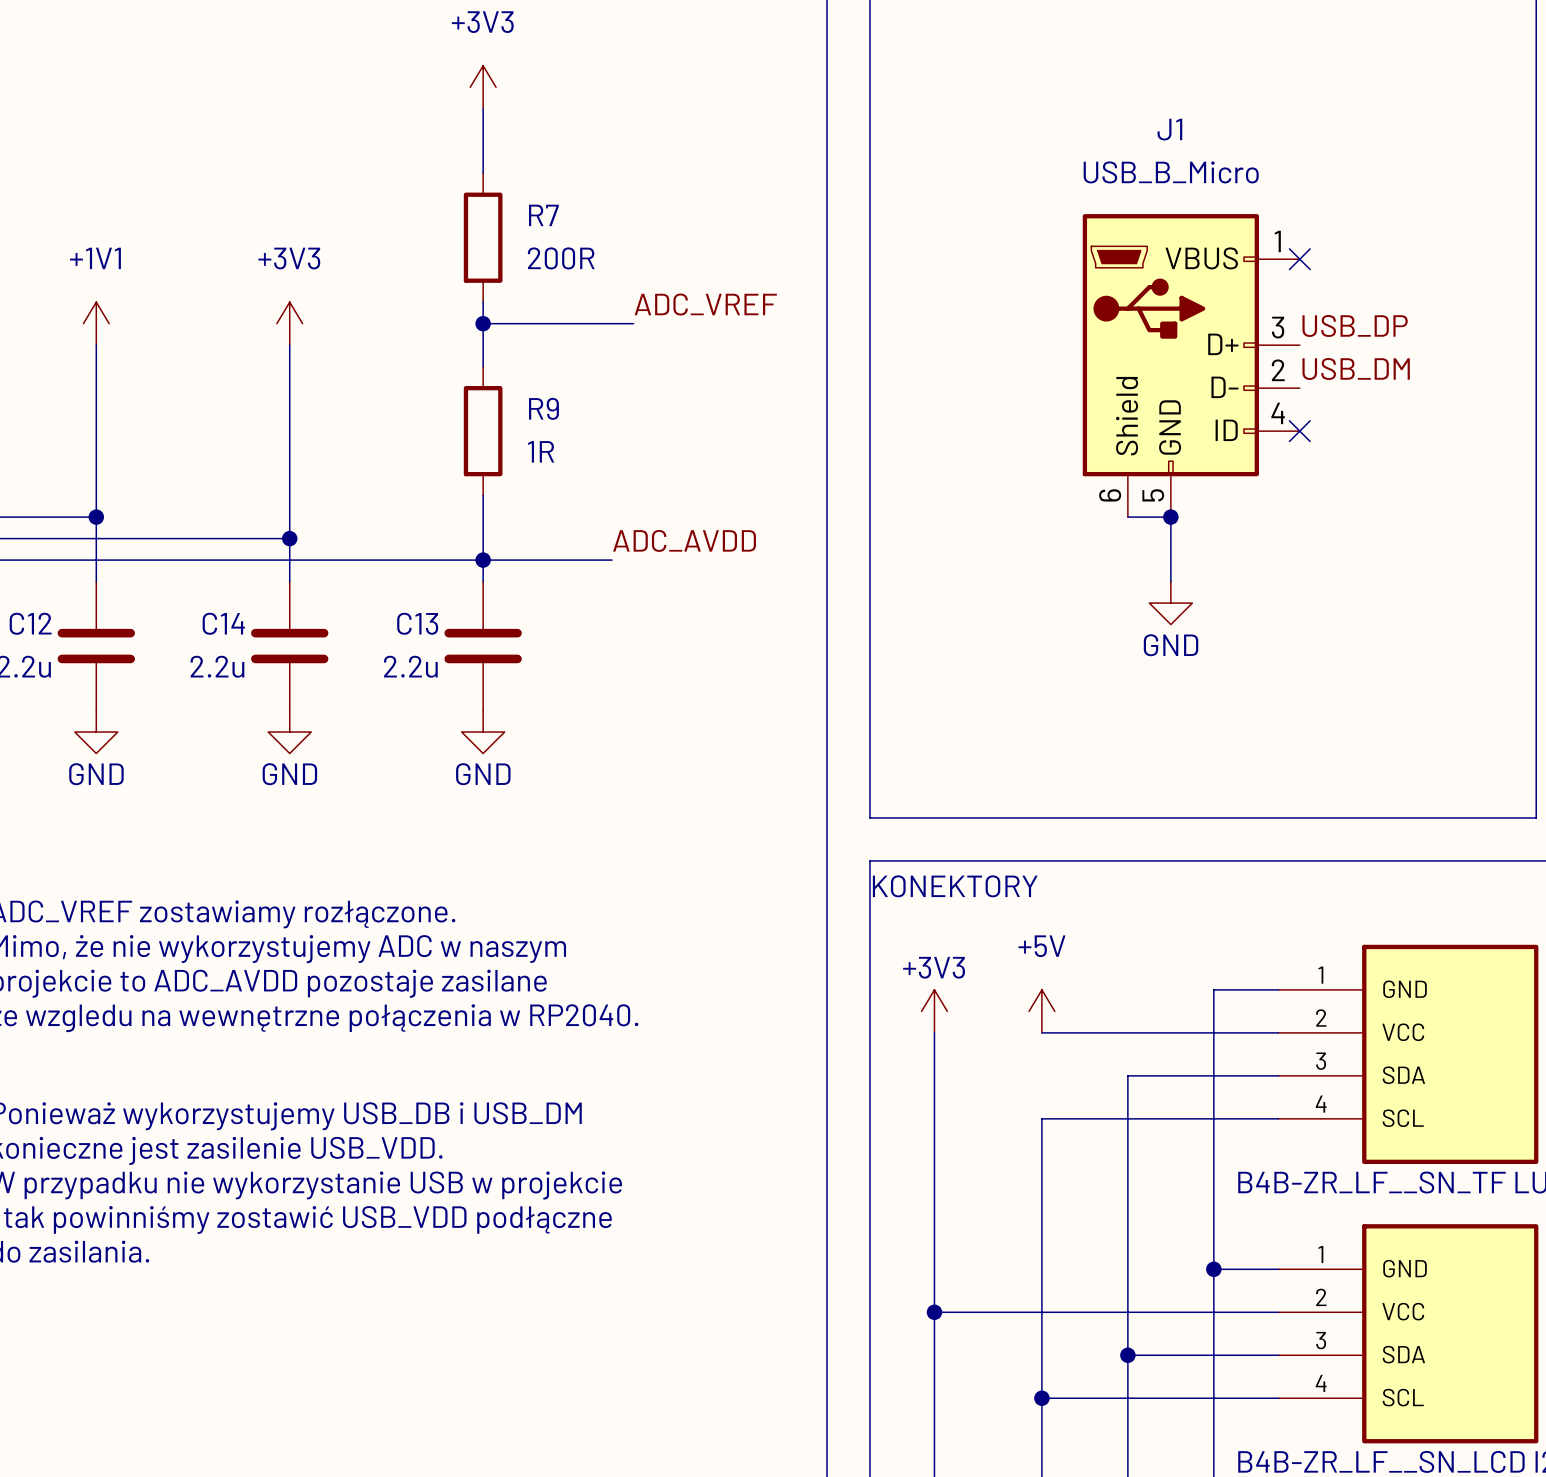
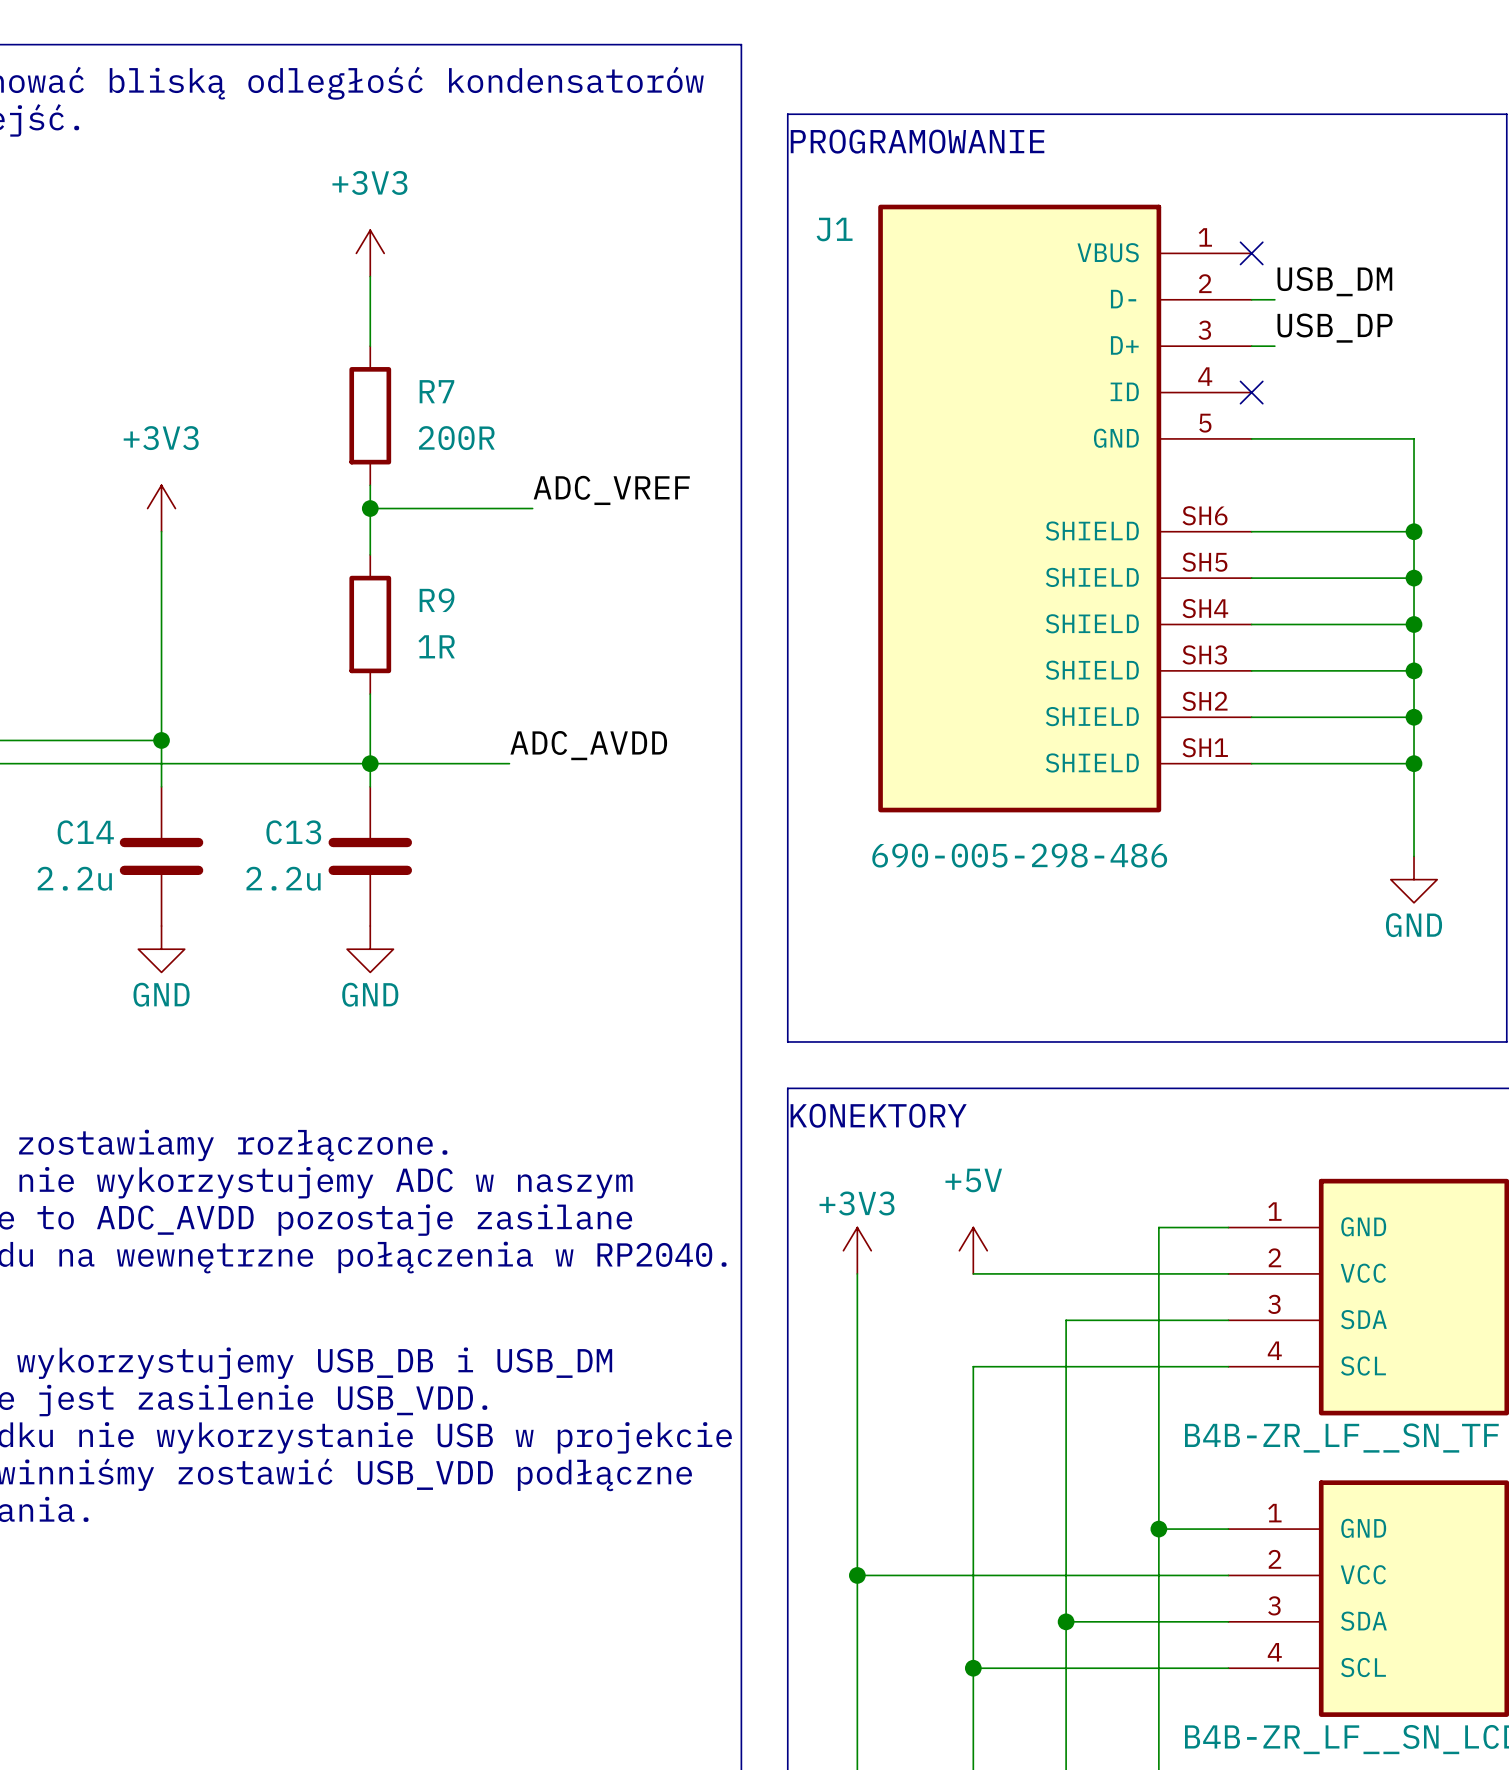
no-connect mark: none -> (1251, 253)
J1 name position: J1 (1169, 129) -> J1 (834, 229)
wire: none -> (1251, 299) (1274, 299)
J1 value: USB_B_Micro (1171, 172) -> 690-005-298-486 (1019, 855)
wire: none -> (1251, 346) (1274, 346)
J1 symbol: [1082, 214, 1300, 518] -> [878, 204, 1252, 813]
wire: none -> (1251, 438) (1414, 438) (1414, 856)
no-connect mark position: (1299, 259) -> (1251, 392)
label position: USB_DP (1355, 325) -> USB_DP (1335, 328)
wire: none -> (1251, 531) (1414, 531)
junction: none -> (1414, 531)
label position: USB_DM (1356, 368) -> USB_DM (1334, 281)
wire: none -> (1251, 578) (1414, 578)
junction: none -> (1414, 578)
wire: none -> (1251, 624) (1414, 624)
no-connect mark: (1299, 431) -> none
junction: none -> (1414, 624)
wire: none -> (1251, 670) (1414, 670)
junction: none -> (1414, 670)
junction: (1170, 517) -> none
wire: none -> (1251, 717) (1414, 717)
junction: none -> (1414, 717)
wire: none -> (1251, 763) (1414, 763)
junction: none -> (1414, 763)
power symbol position: GND (1170, 603) -> GND (1414, 879)

